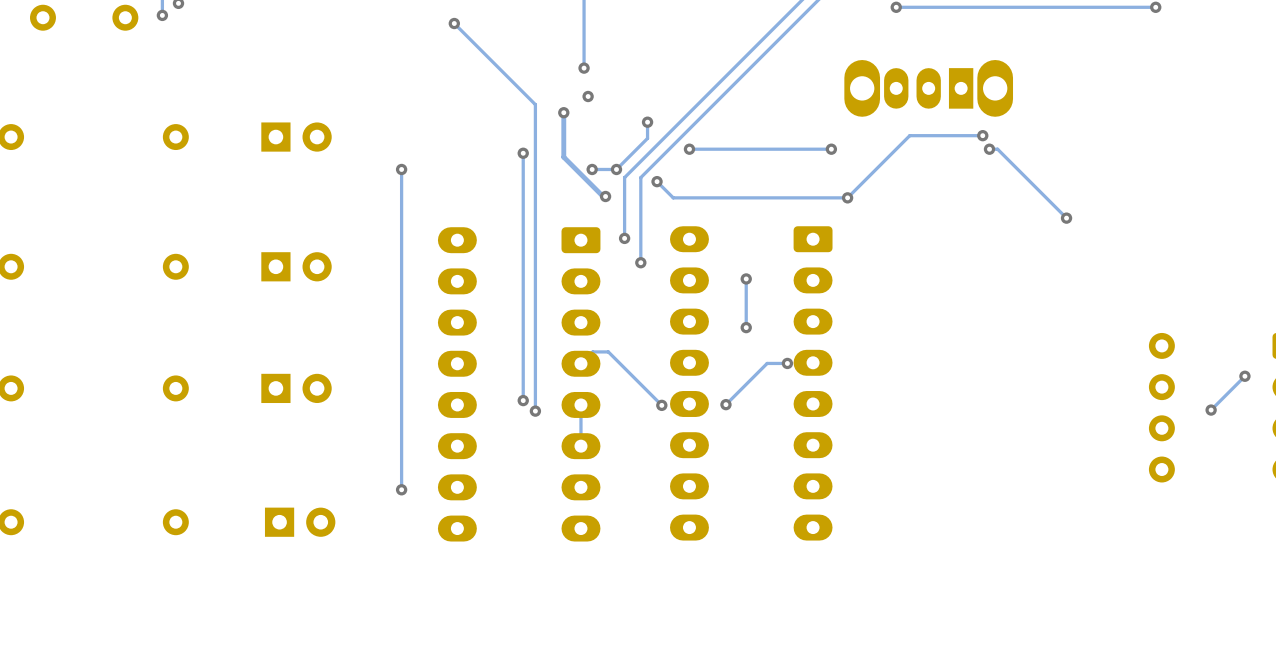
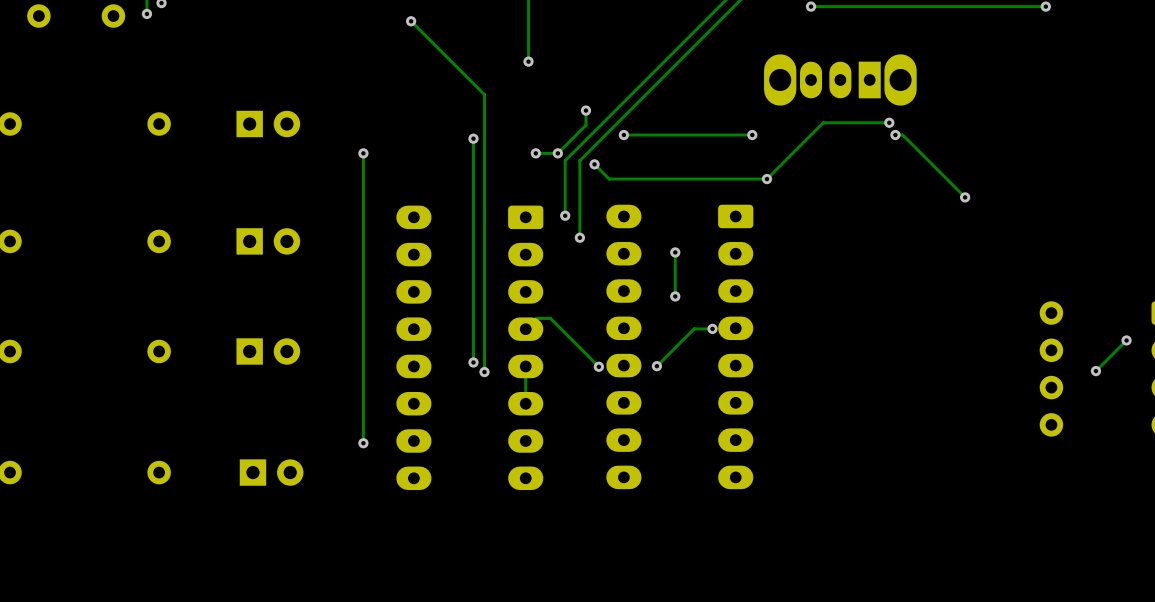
via: (588, 96) -> none
track: (563, 112) (563, 157) (603, 196) (605, 196) -> none
via: (563, 112) -> none
via: (605, 196) -> none

